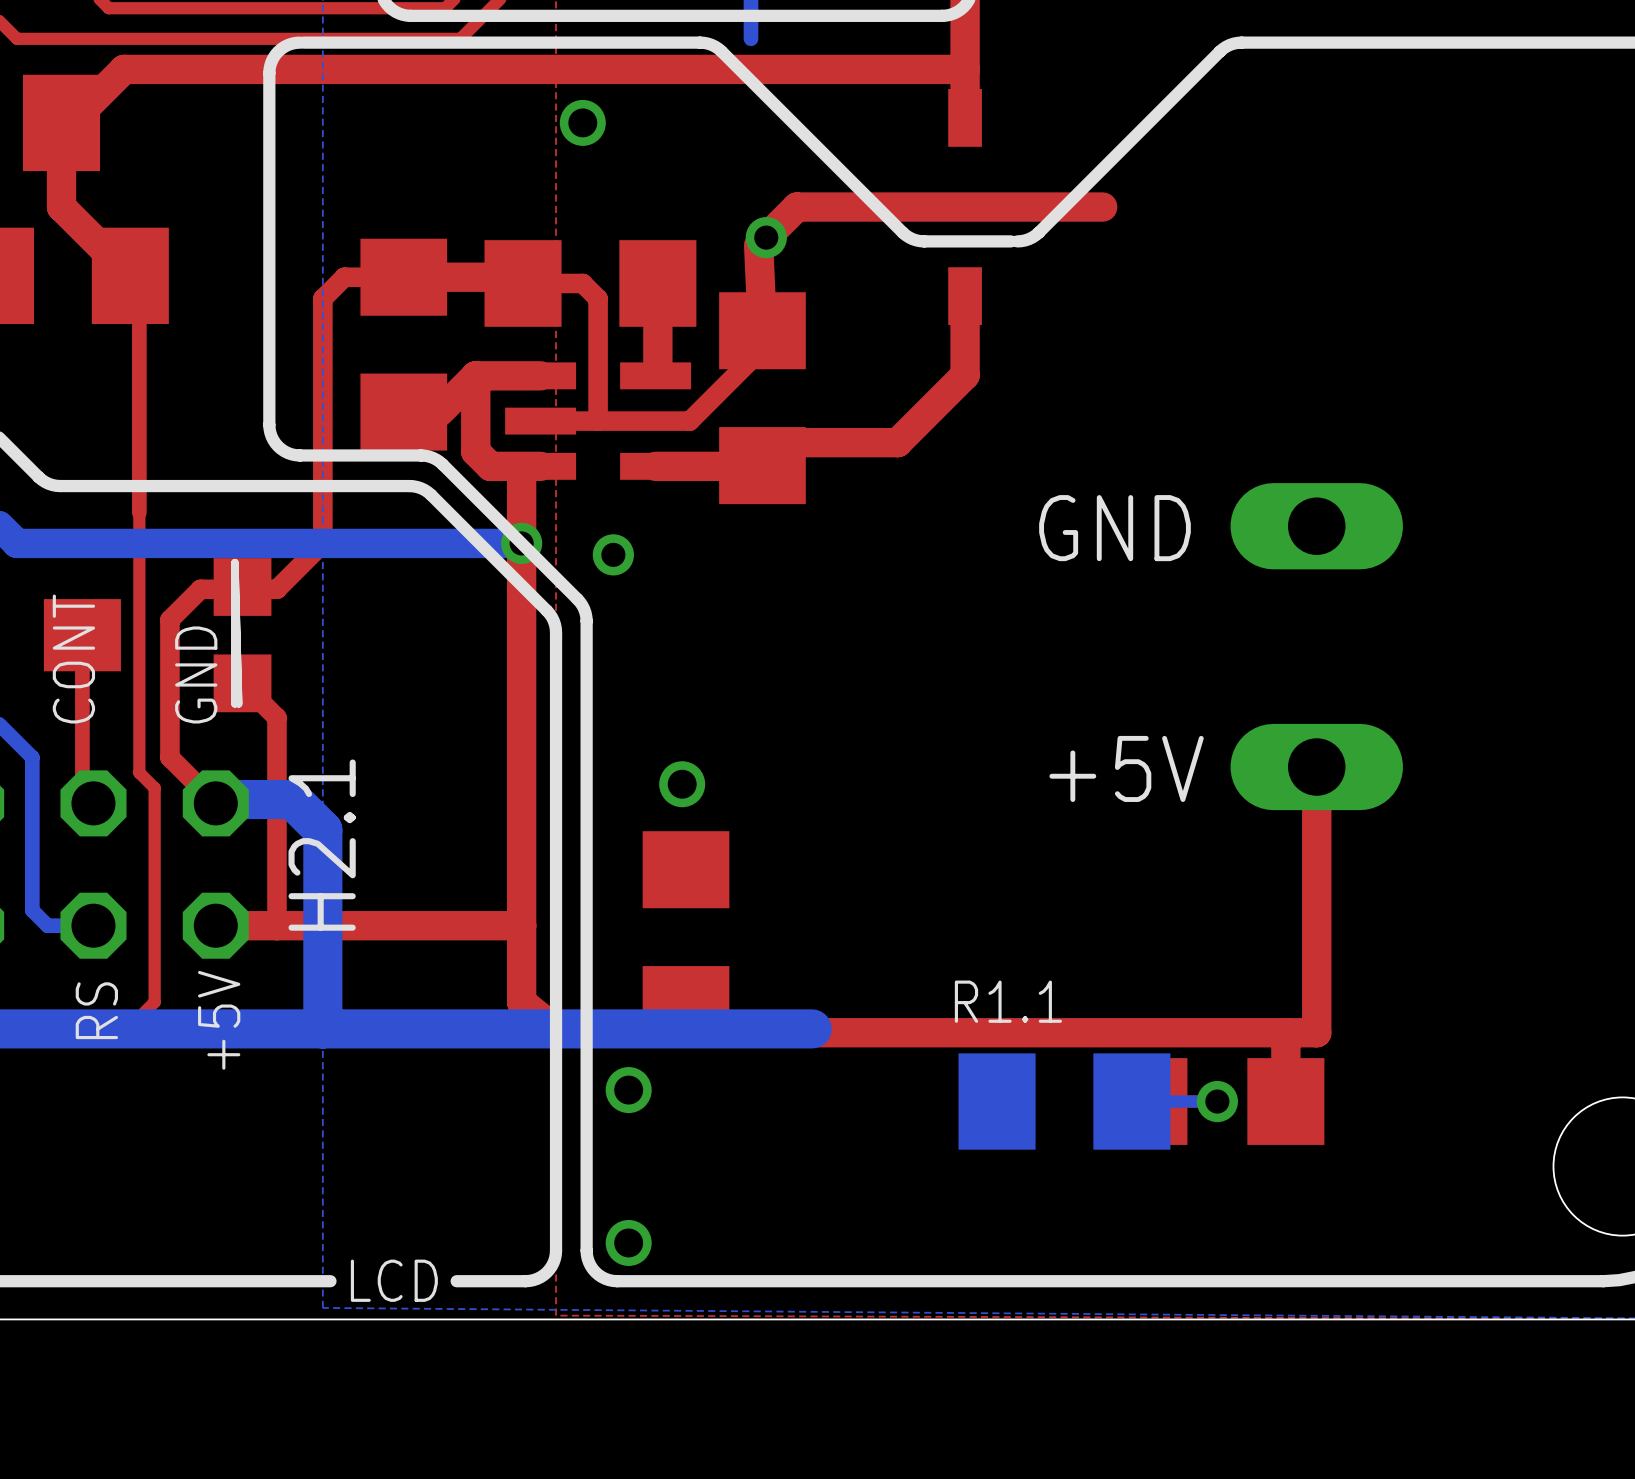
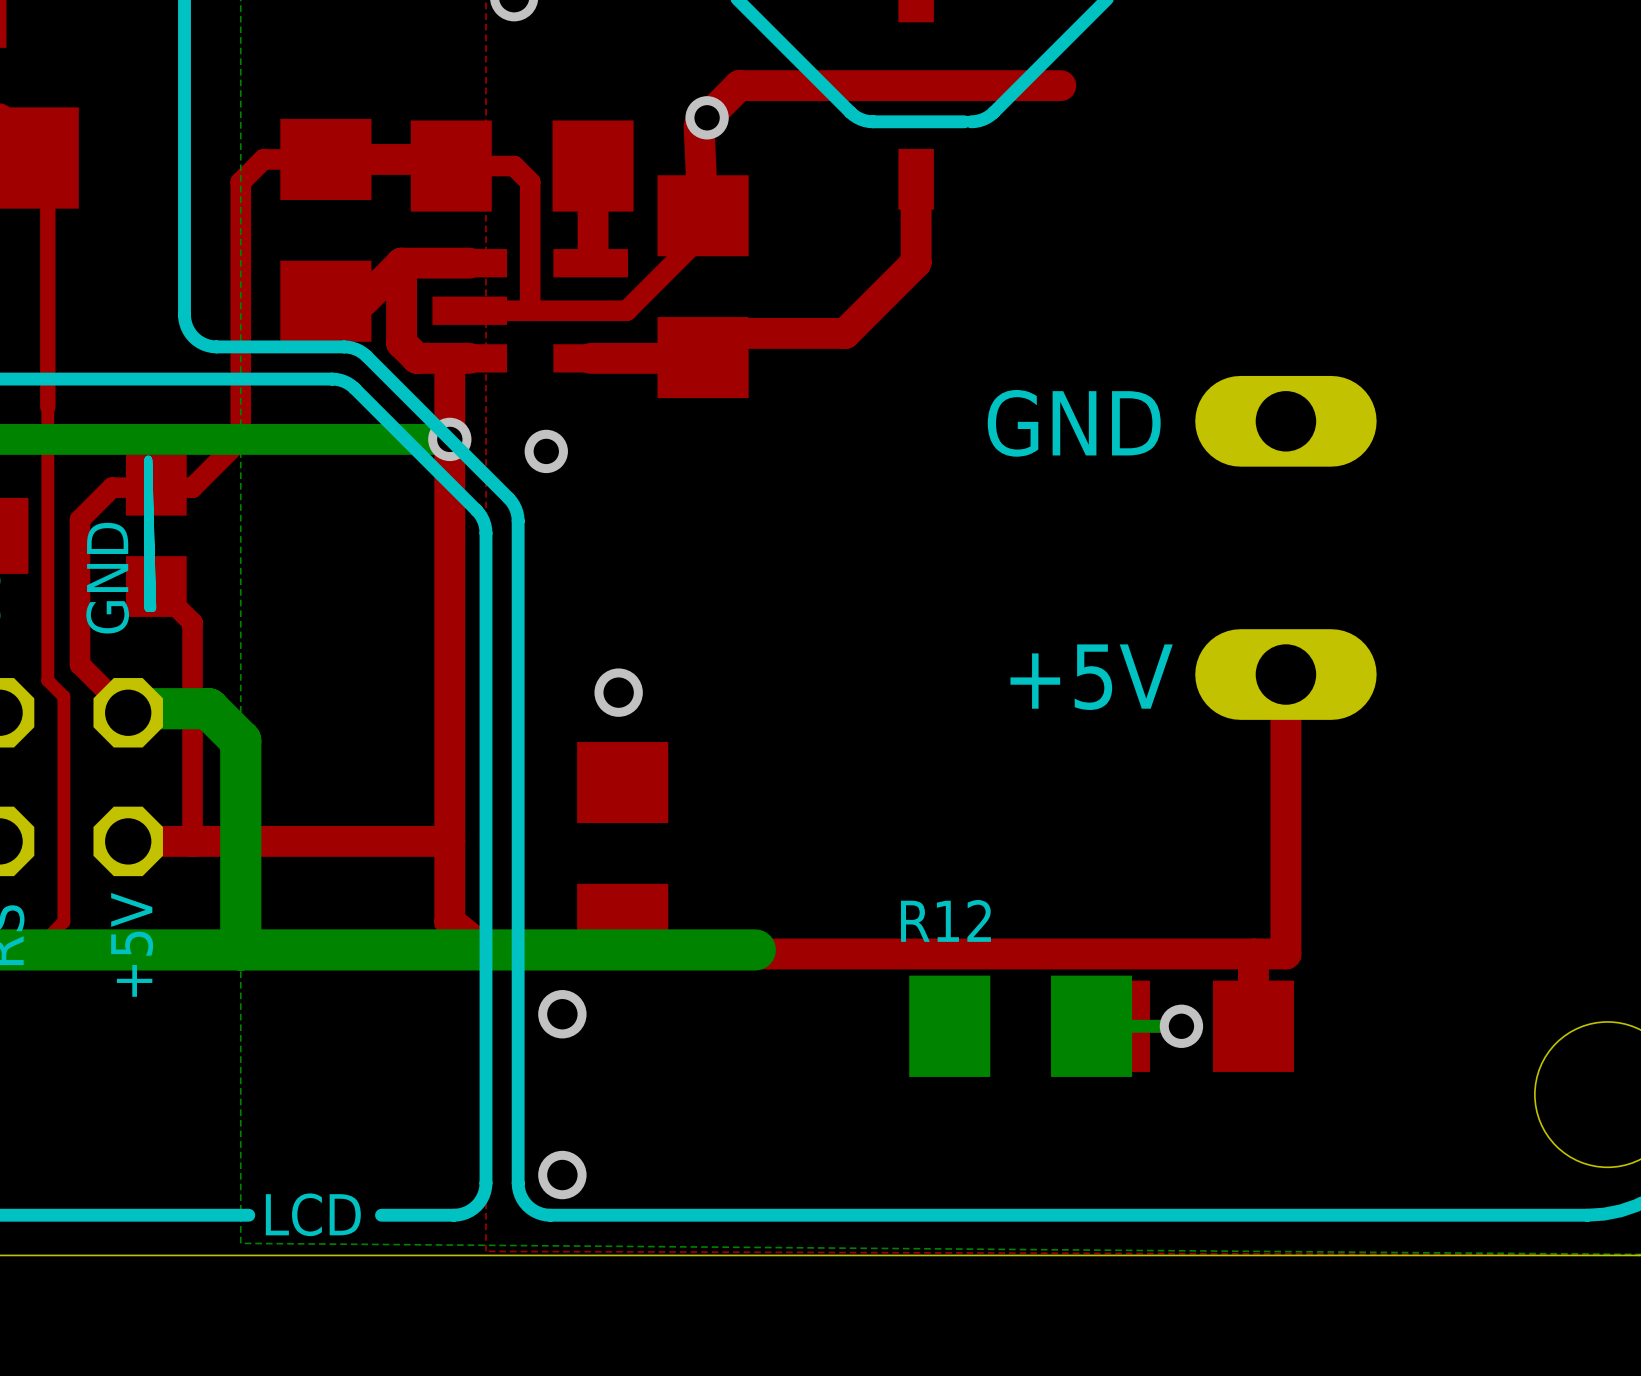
H2.1 name: H2.1 (322, 845) -> none
R1.1 name: R1.1 (1008, 1001) -> R12 (945, 920)

